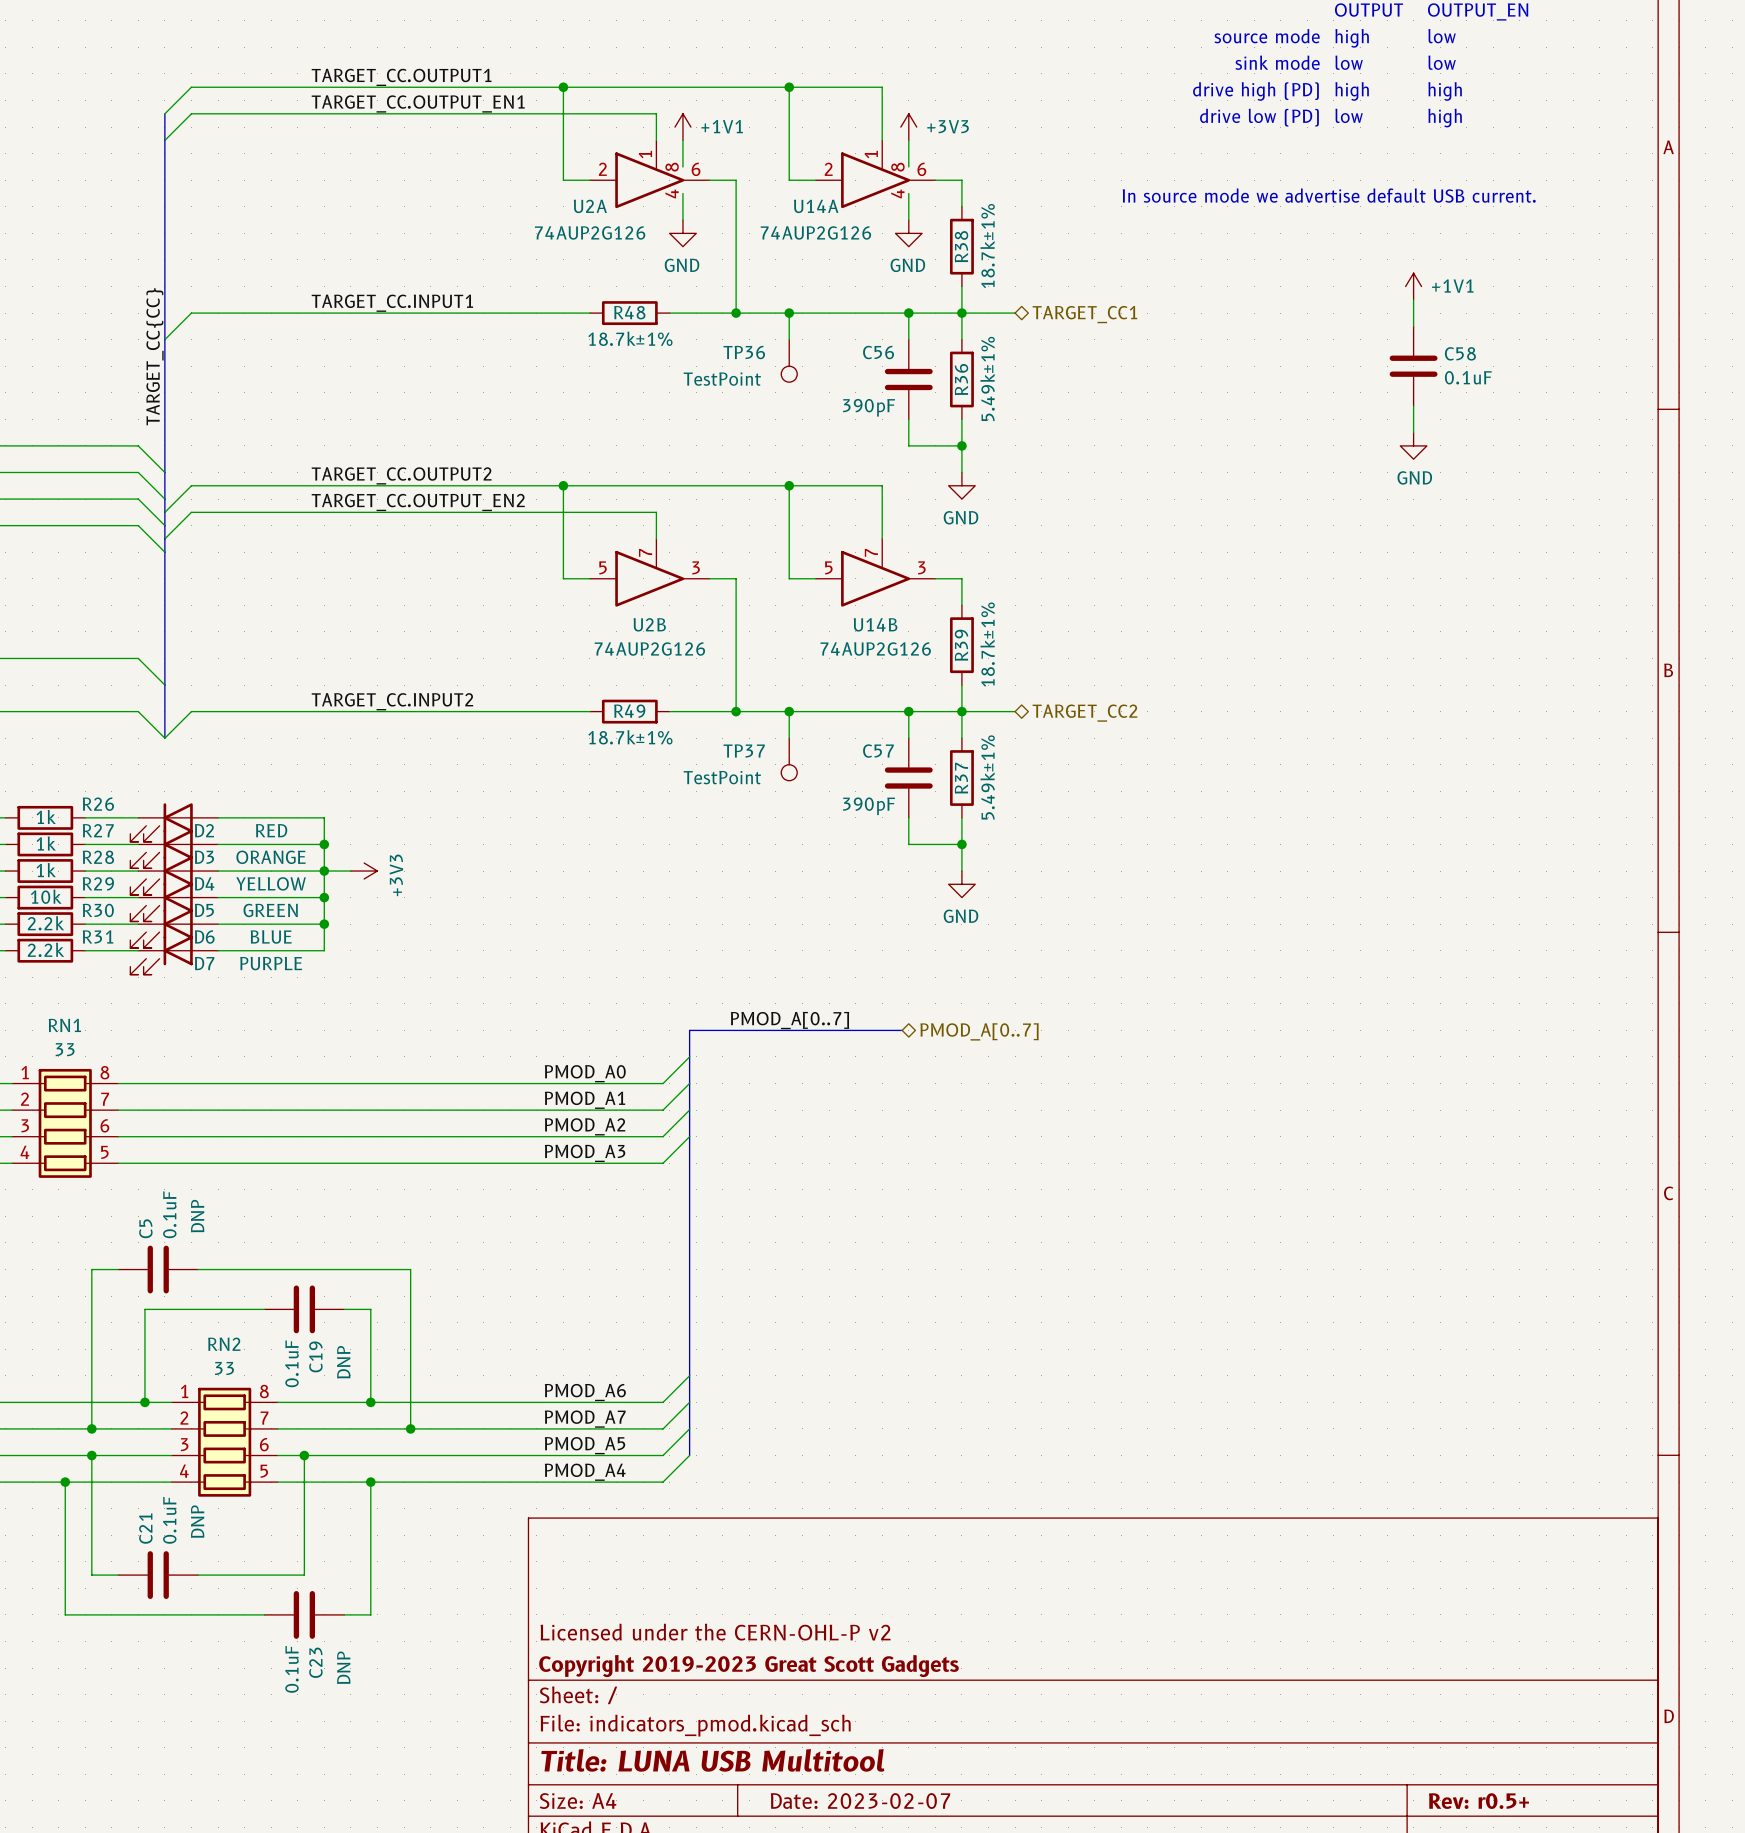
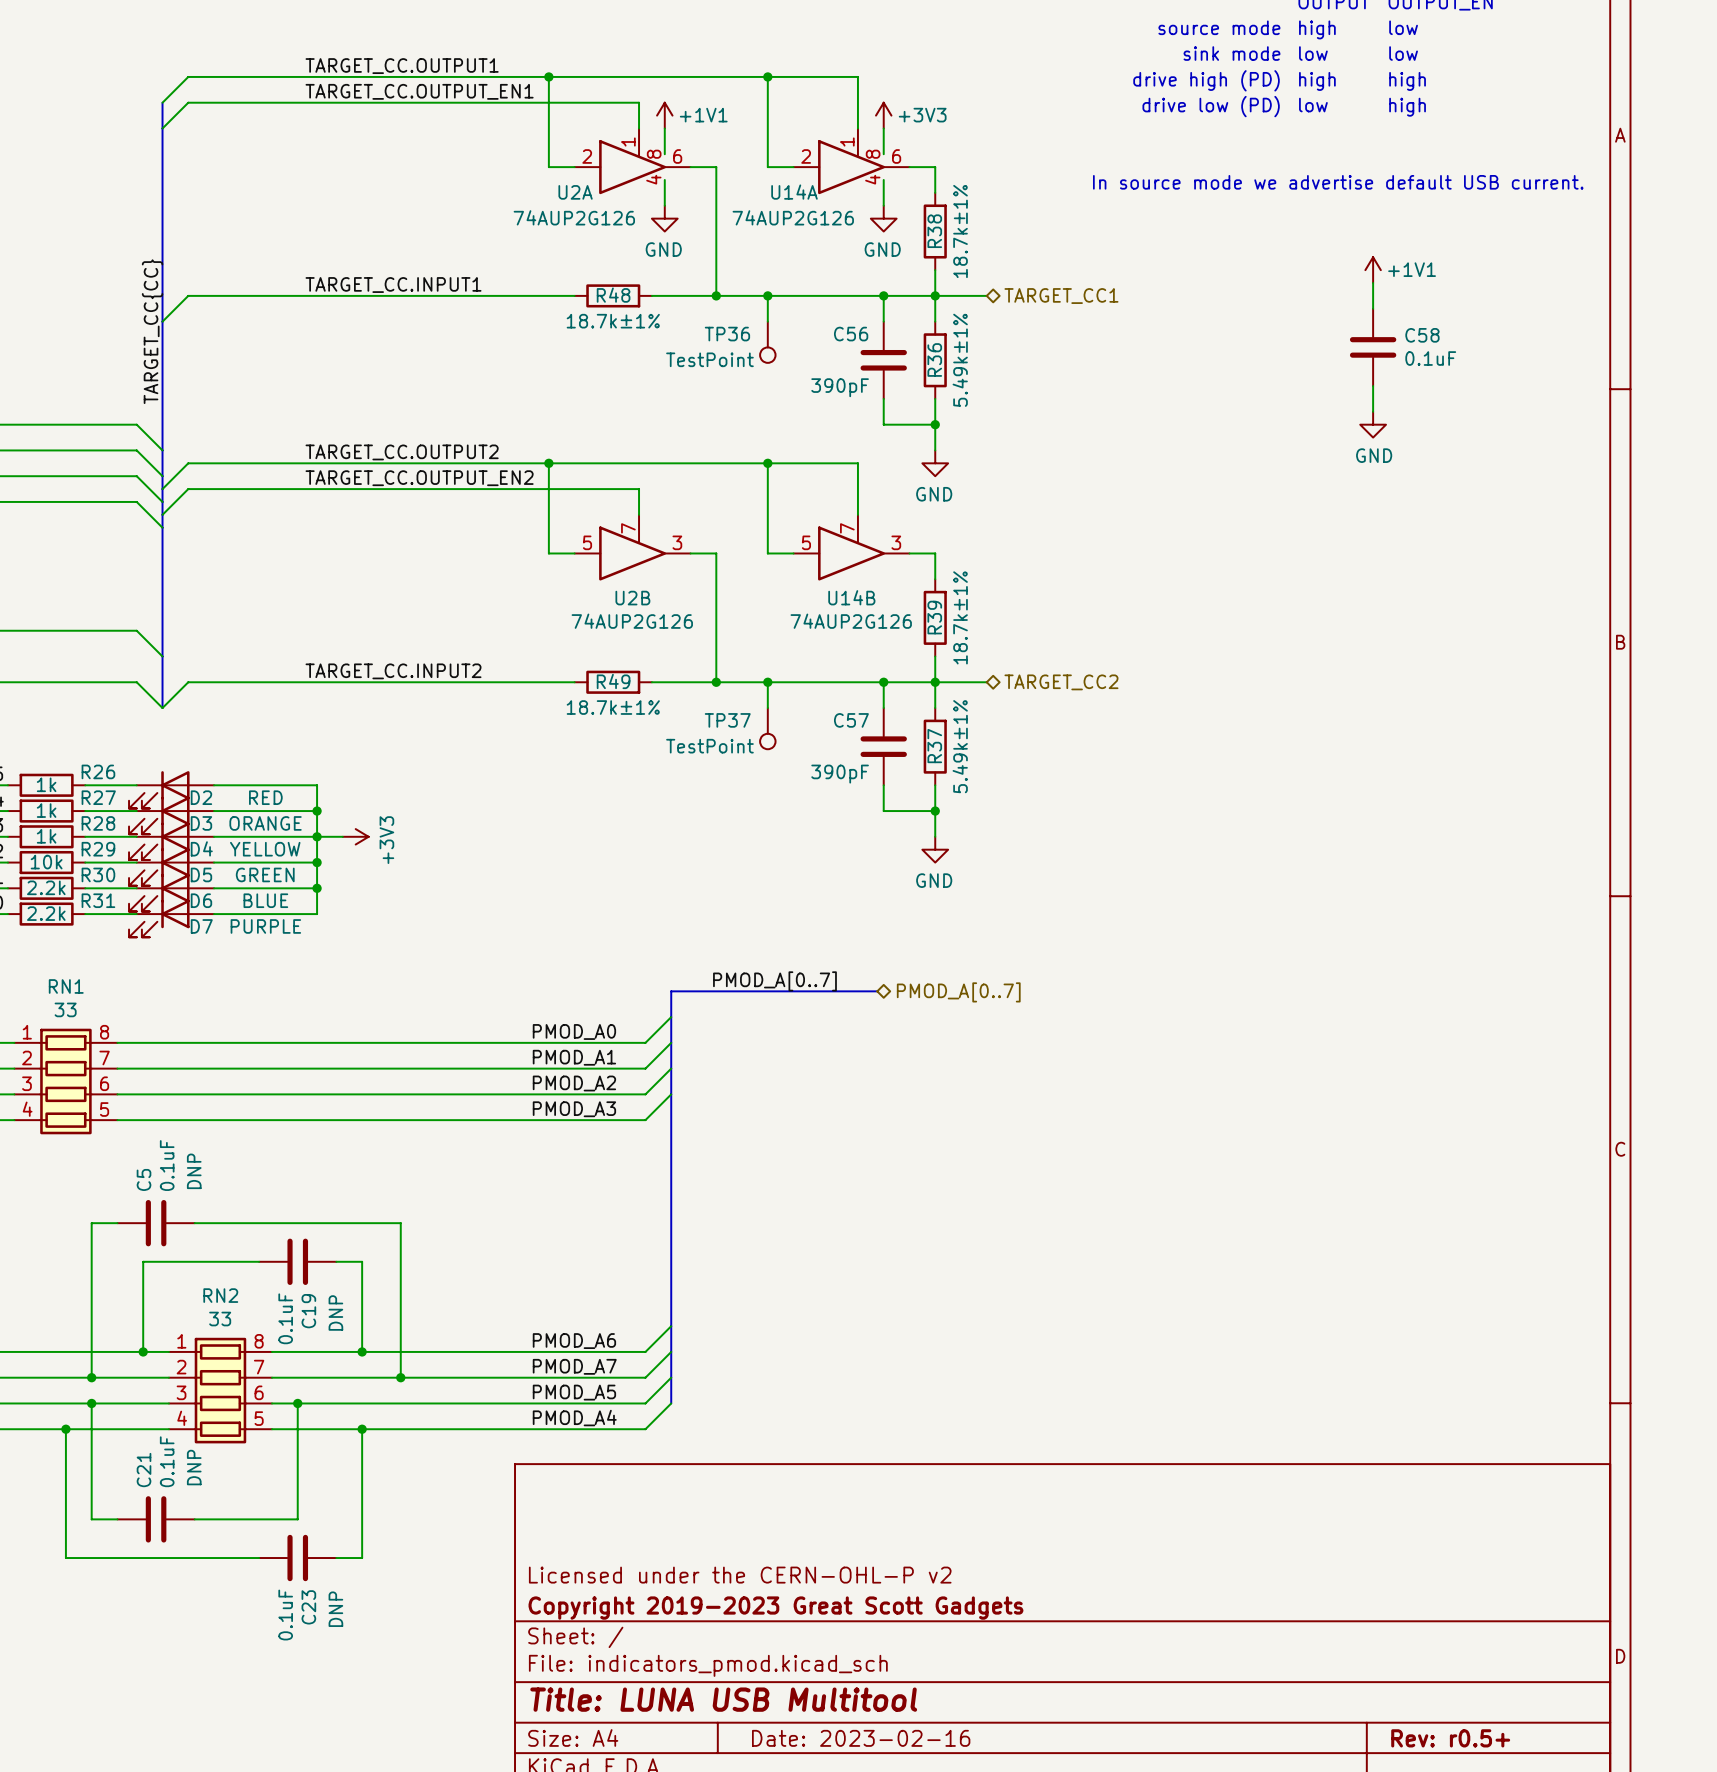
title block: Date: 2023-02-07 (860, 1801) -> Date: 2023-02-16 (861, 1738)

